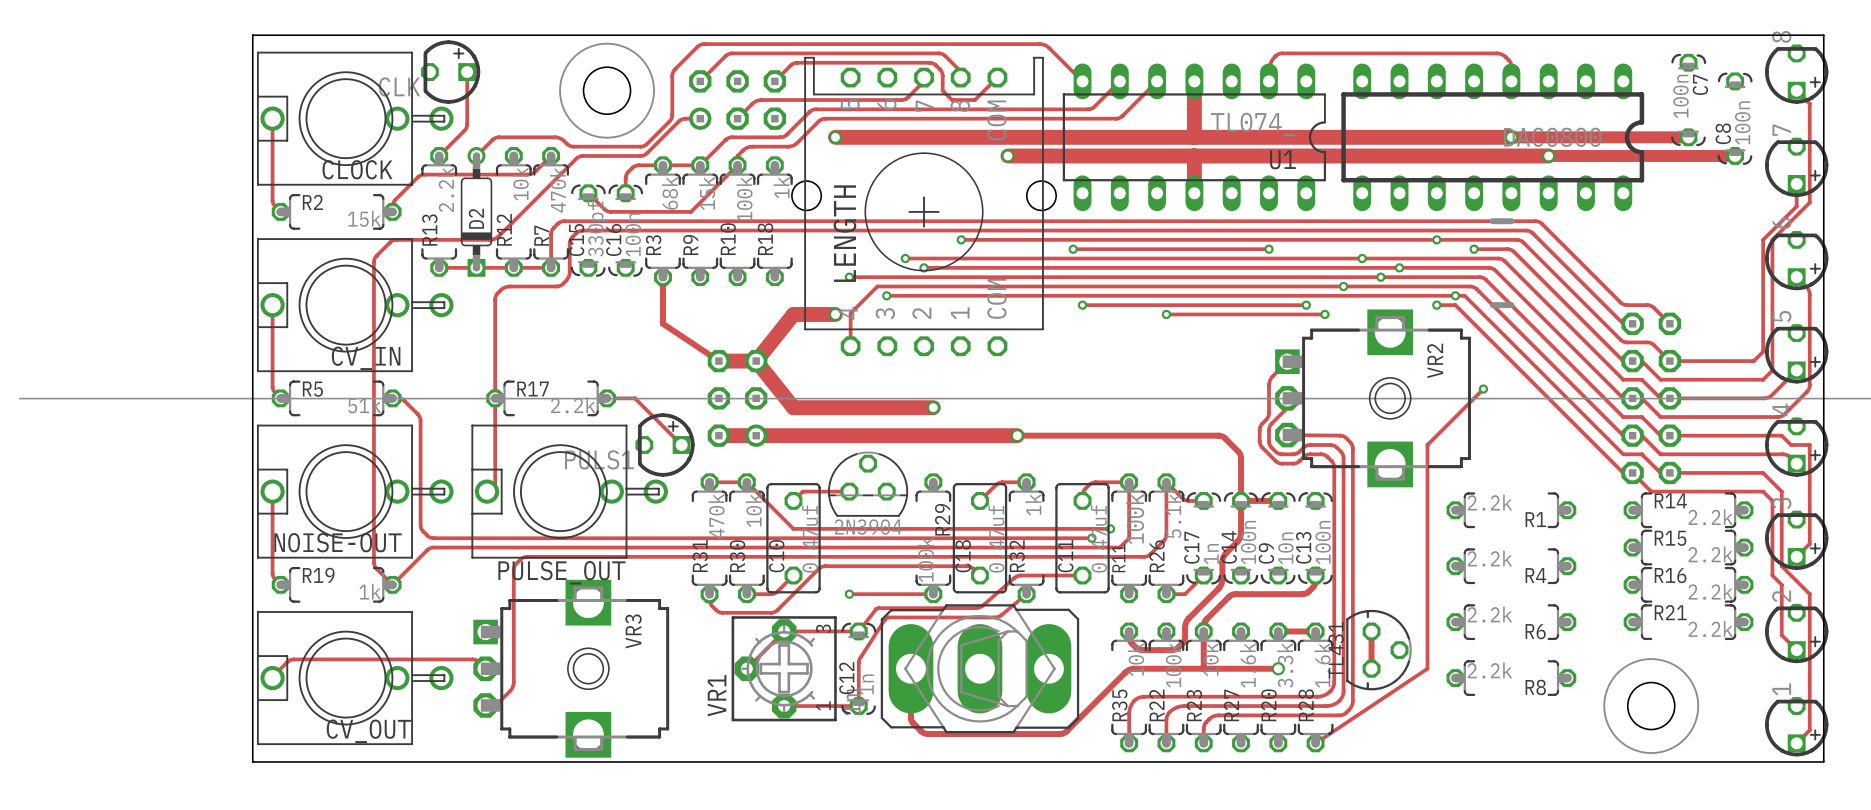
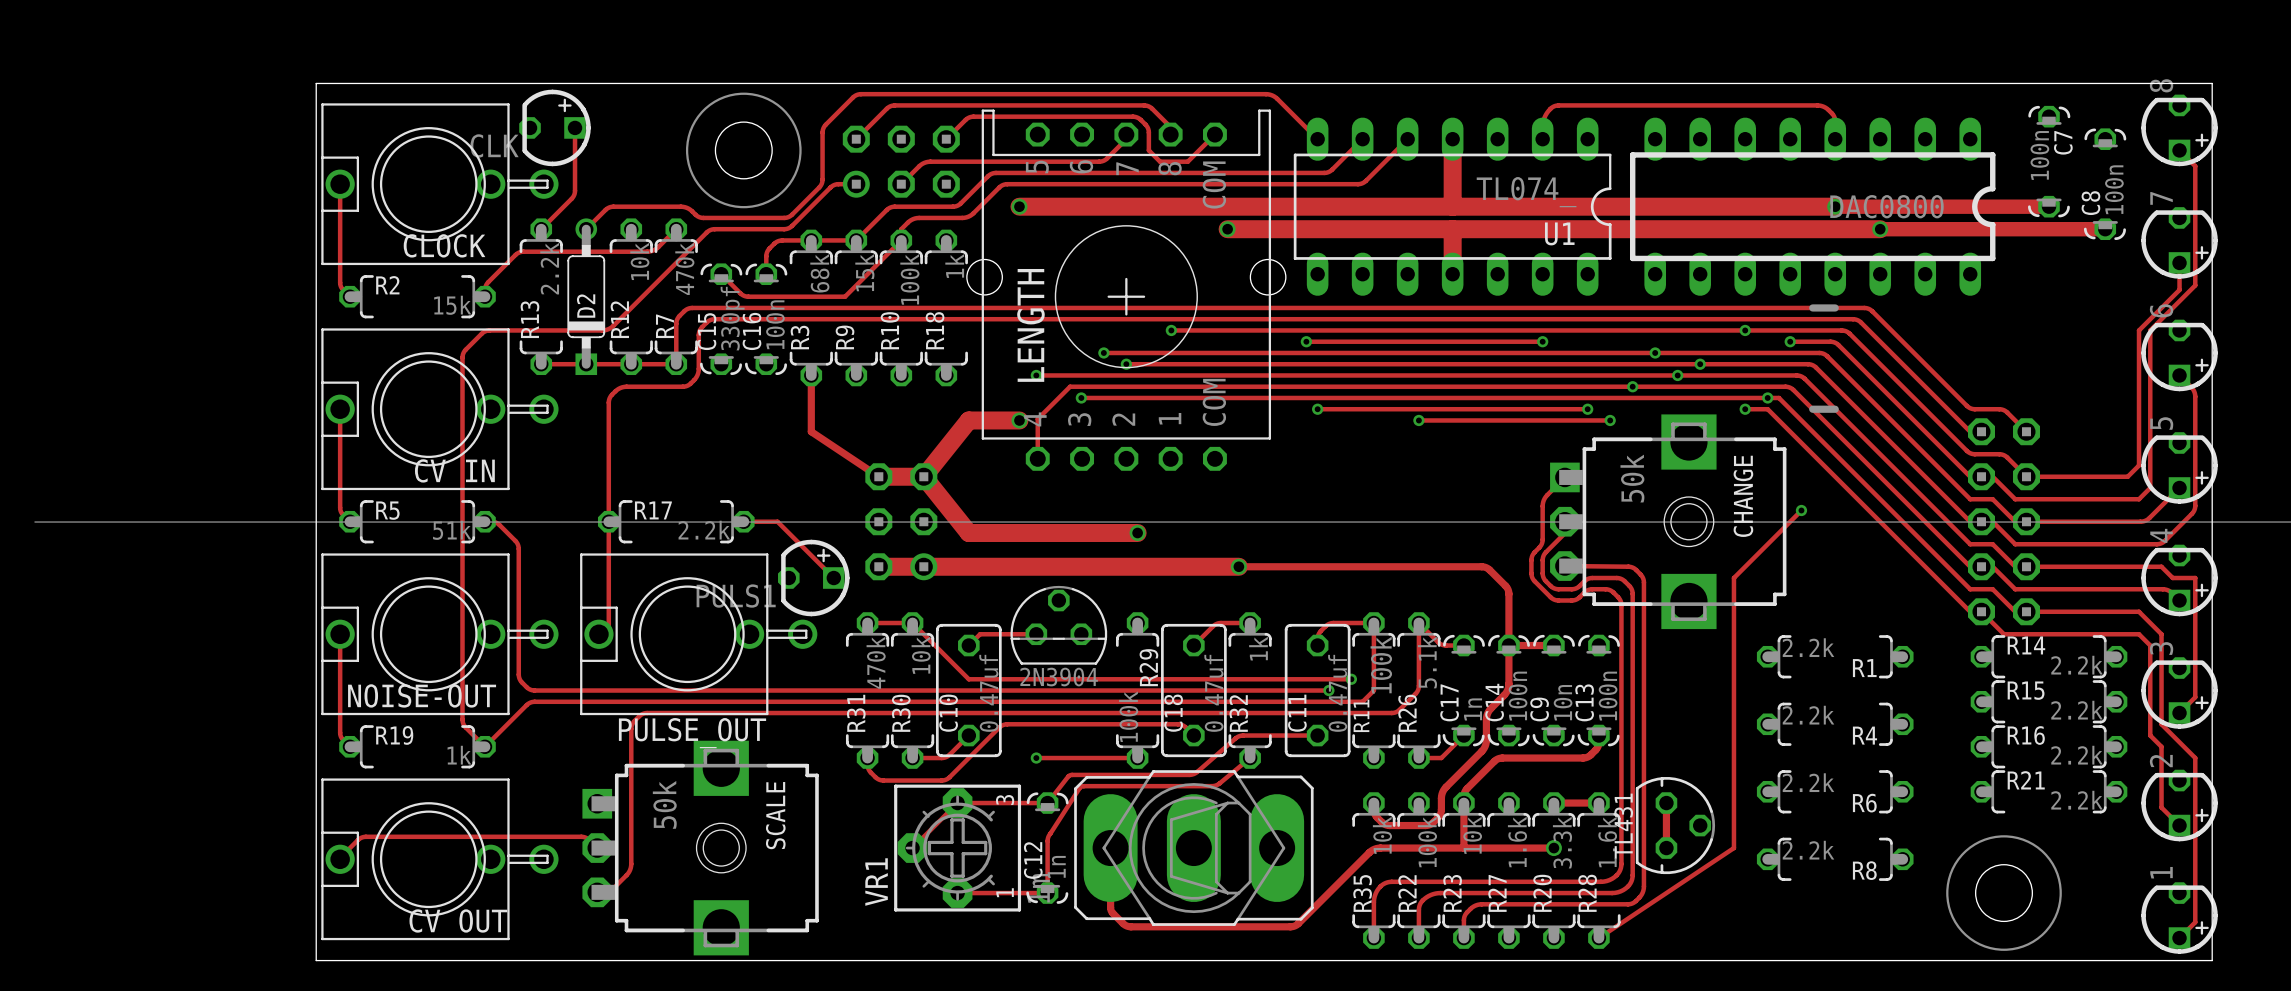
VR2 name: VR2 (1435, 360) -> CHANGE (1743, 496)
VR2 value: none -> 50k (1632, 478)
VR3 name: VR3 (633, 631) -> SCALE (775, 815)
VR3 value: none -> 50k (664, 804)

